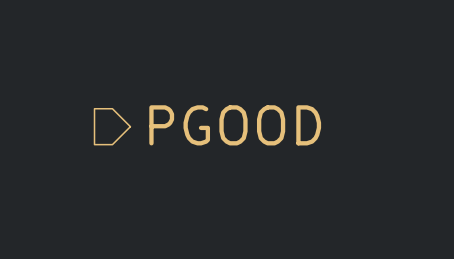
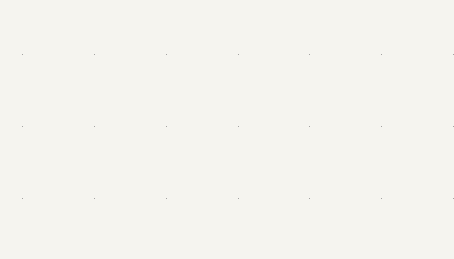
hierarchical label: PGOOD (235, 125) -> none

